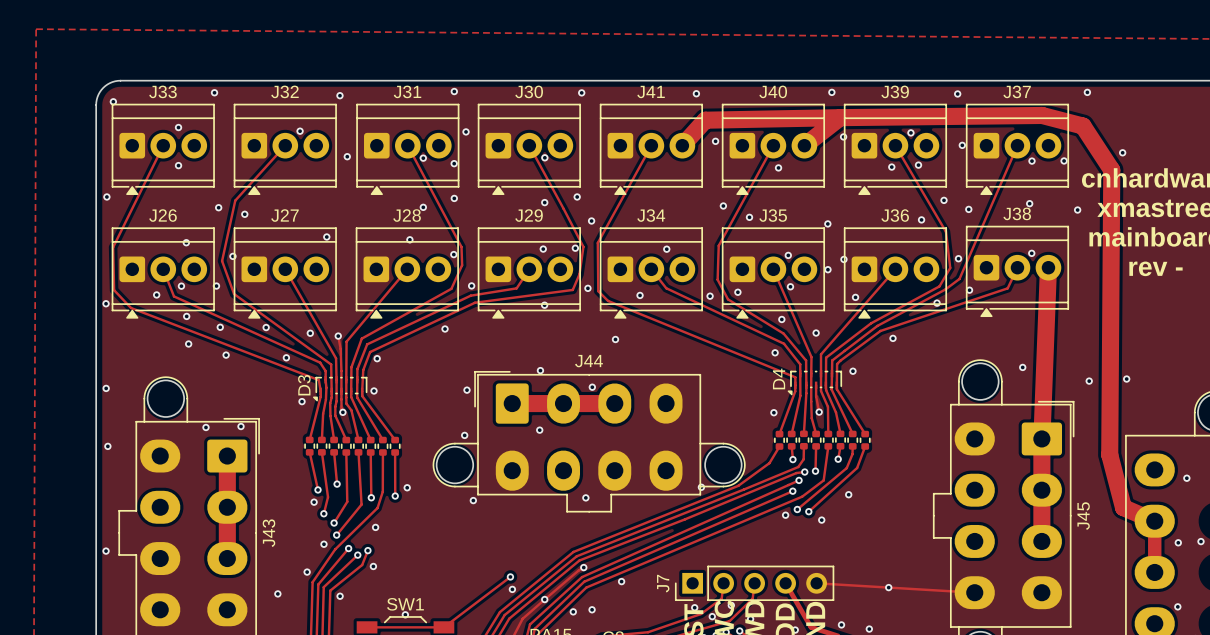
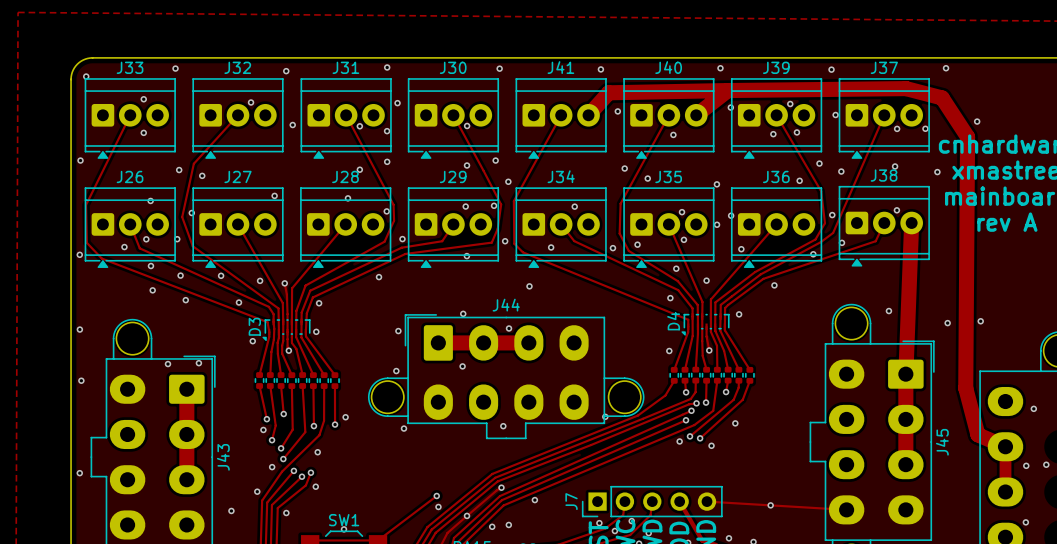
text: rev - (1155, 268) -> rev A (1007, 222)

